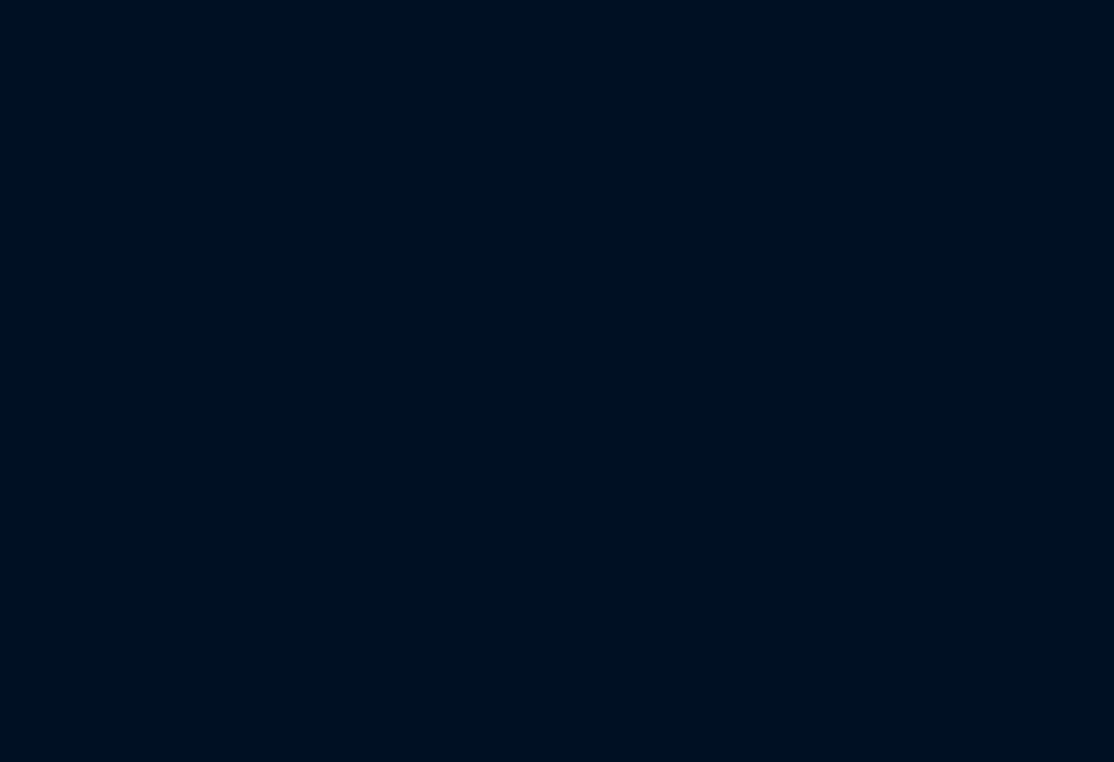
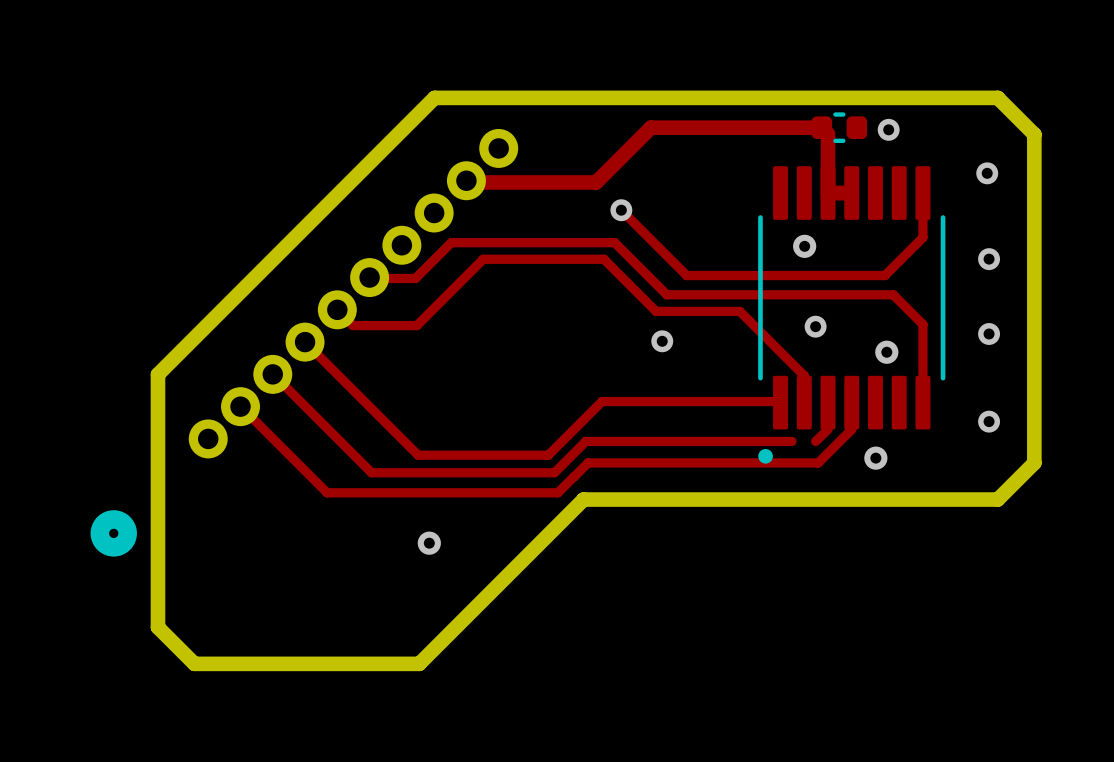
board edge: none -> (434, 97) (157, 374) (157, 627) (194, 663) (419, 663) (583, 499) (997, 499) (1034, 463) (1034, 134) (997, 97) (434, 97)
track: none -> (821, 127) (650, 127) (596, 182) (468, 182)
part: none -> (839, 127)
via: none -> (888, 129)
track: none -> (828, 133) (828, 193) (851, 193)
via: none -> (987, 173)
track: none -> (922, 193) (922, 237) (884, 275) (686, 275) (621, 210)
via: none -> (621, 210)
via: none -> (804, 246)
via: none -> (989, 259)
track: none -> (370, 278) (415, 278) (451, 242) (614, 242) (666, 294) (893, 294) (922, 324) (922, 402)
track: none -> (337, 309) (353, 325) (416, 325) (483, 259) (603, 259) (656, 311) (739, 311) (804, 375) (804, 402)
part: none -> (851, 314)
via: none -> (815, 326)
via: none -> (989, 333)
via: none -> (662, 341)
part: none -> (304, 342)
track: none -> (305, 342) (418, 455) (548, 455) (602, 401) (779, 401)
via: none -> (886, 352)
track: none -> (273, 374) (371, 472) (554, 472) (585, 441) (791, 441)
track: none -> (851, 402) (851, 429) (818, 462) (588, 462) (557, 492) (327, 492) (240, 406)
via: none -> (989, 421)
track: none -> (828, 429) (815, 441)
via: none -> (875, 458)
via: none -> (429, 543)

